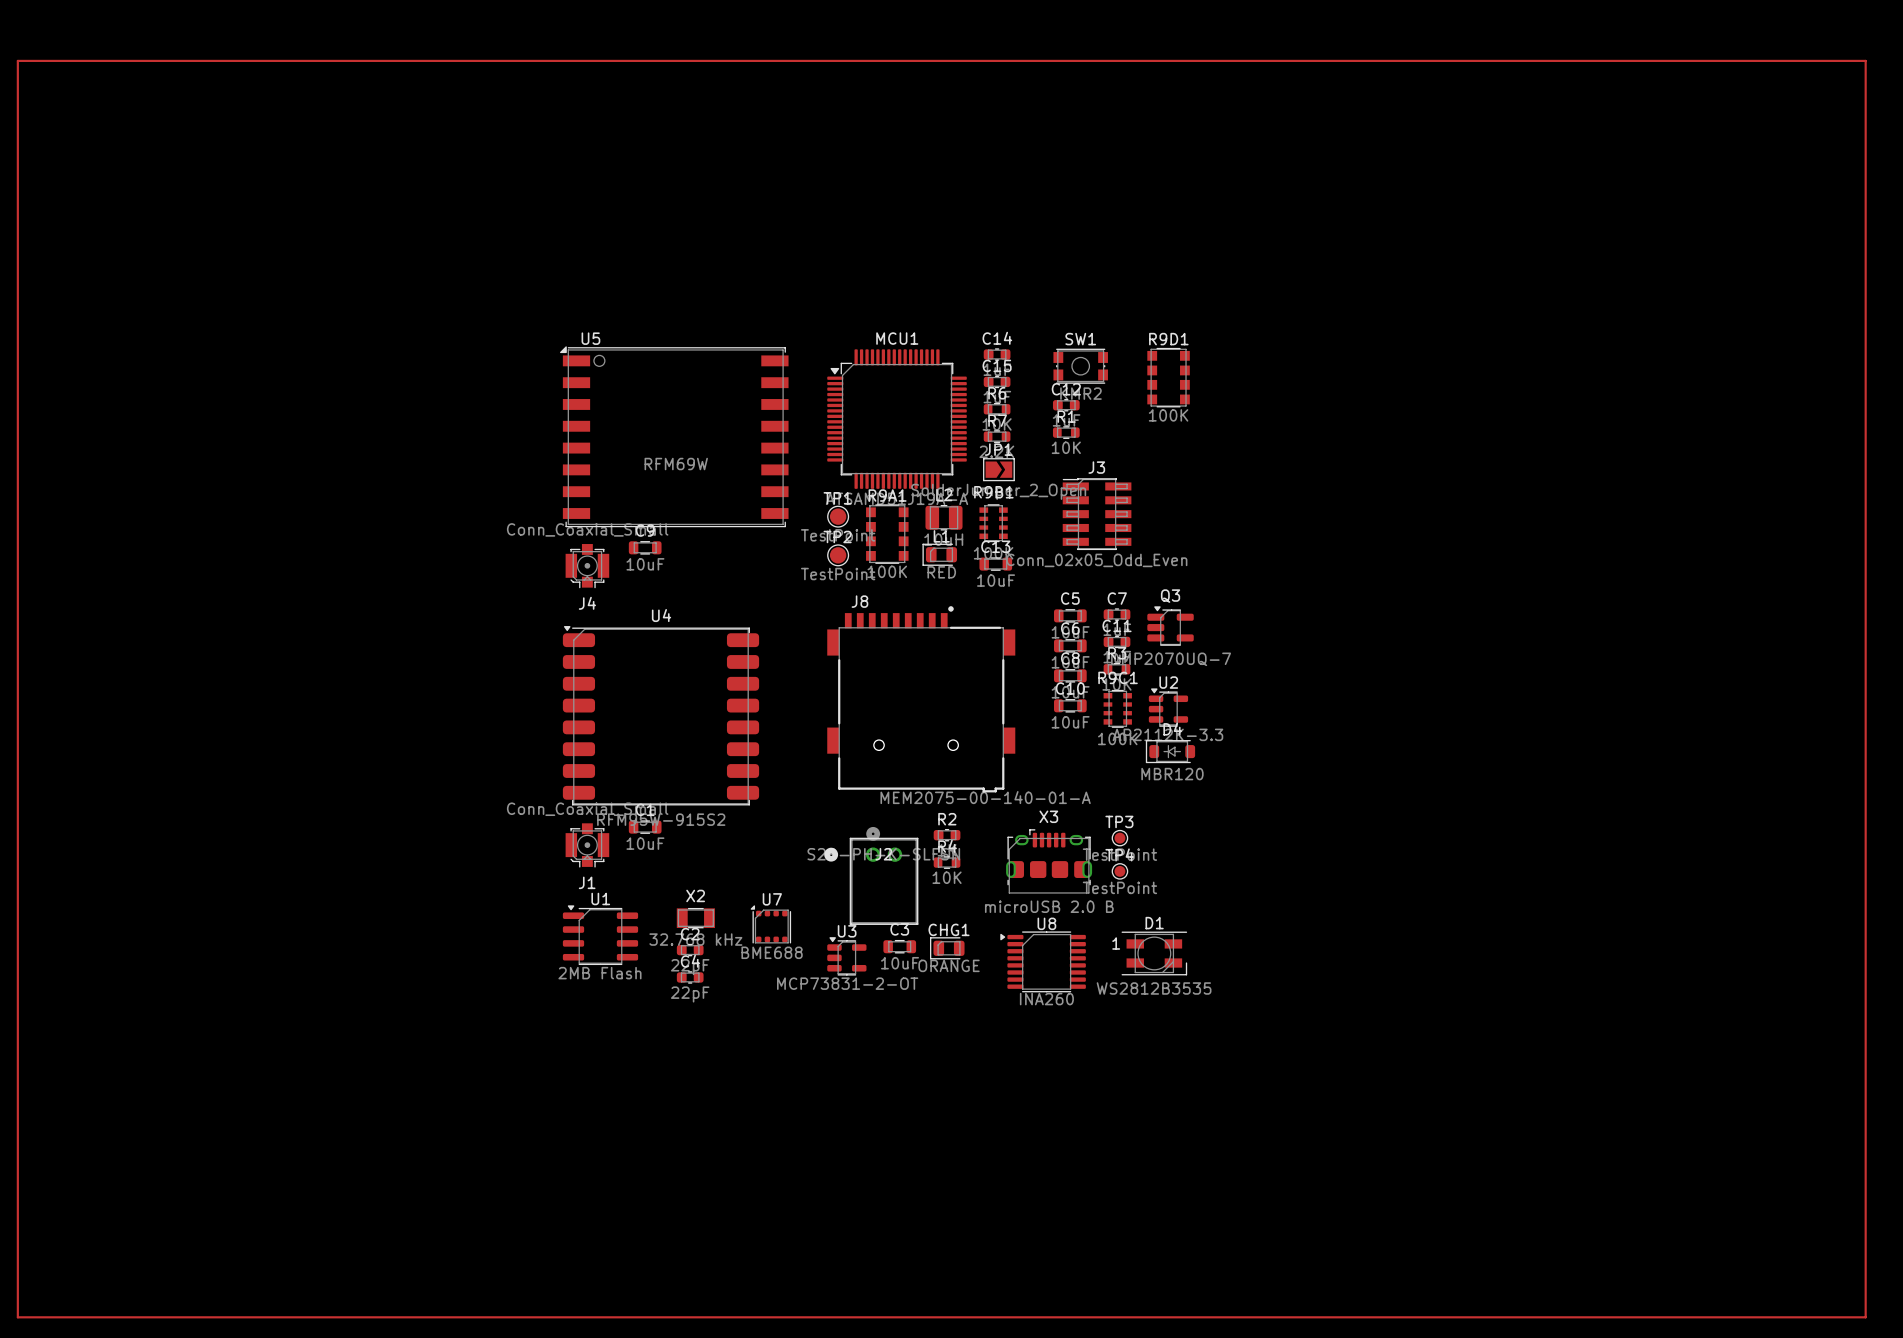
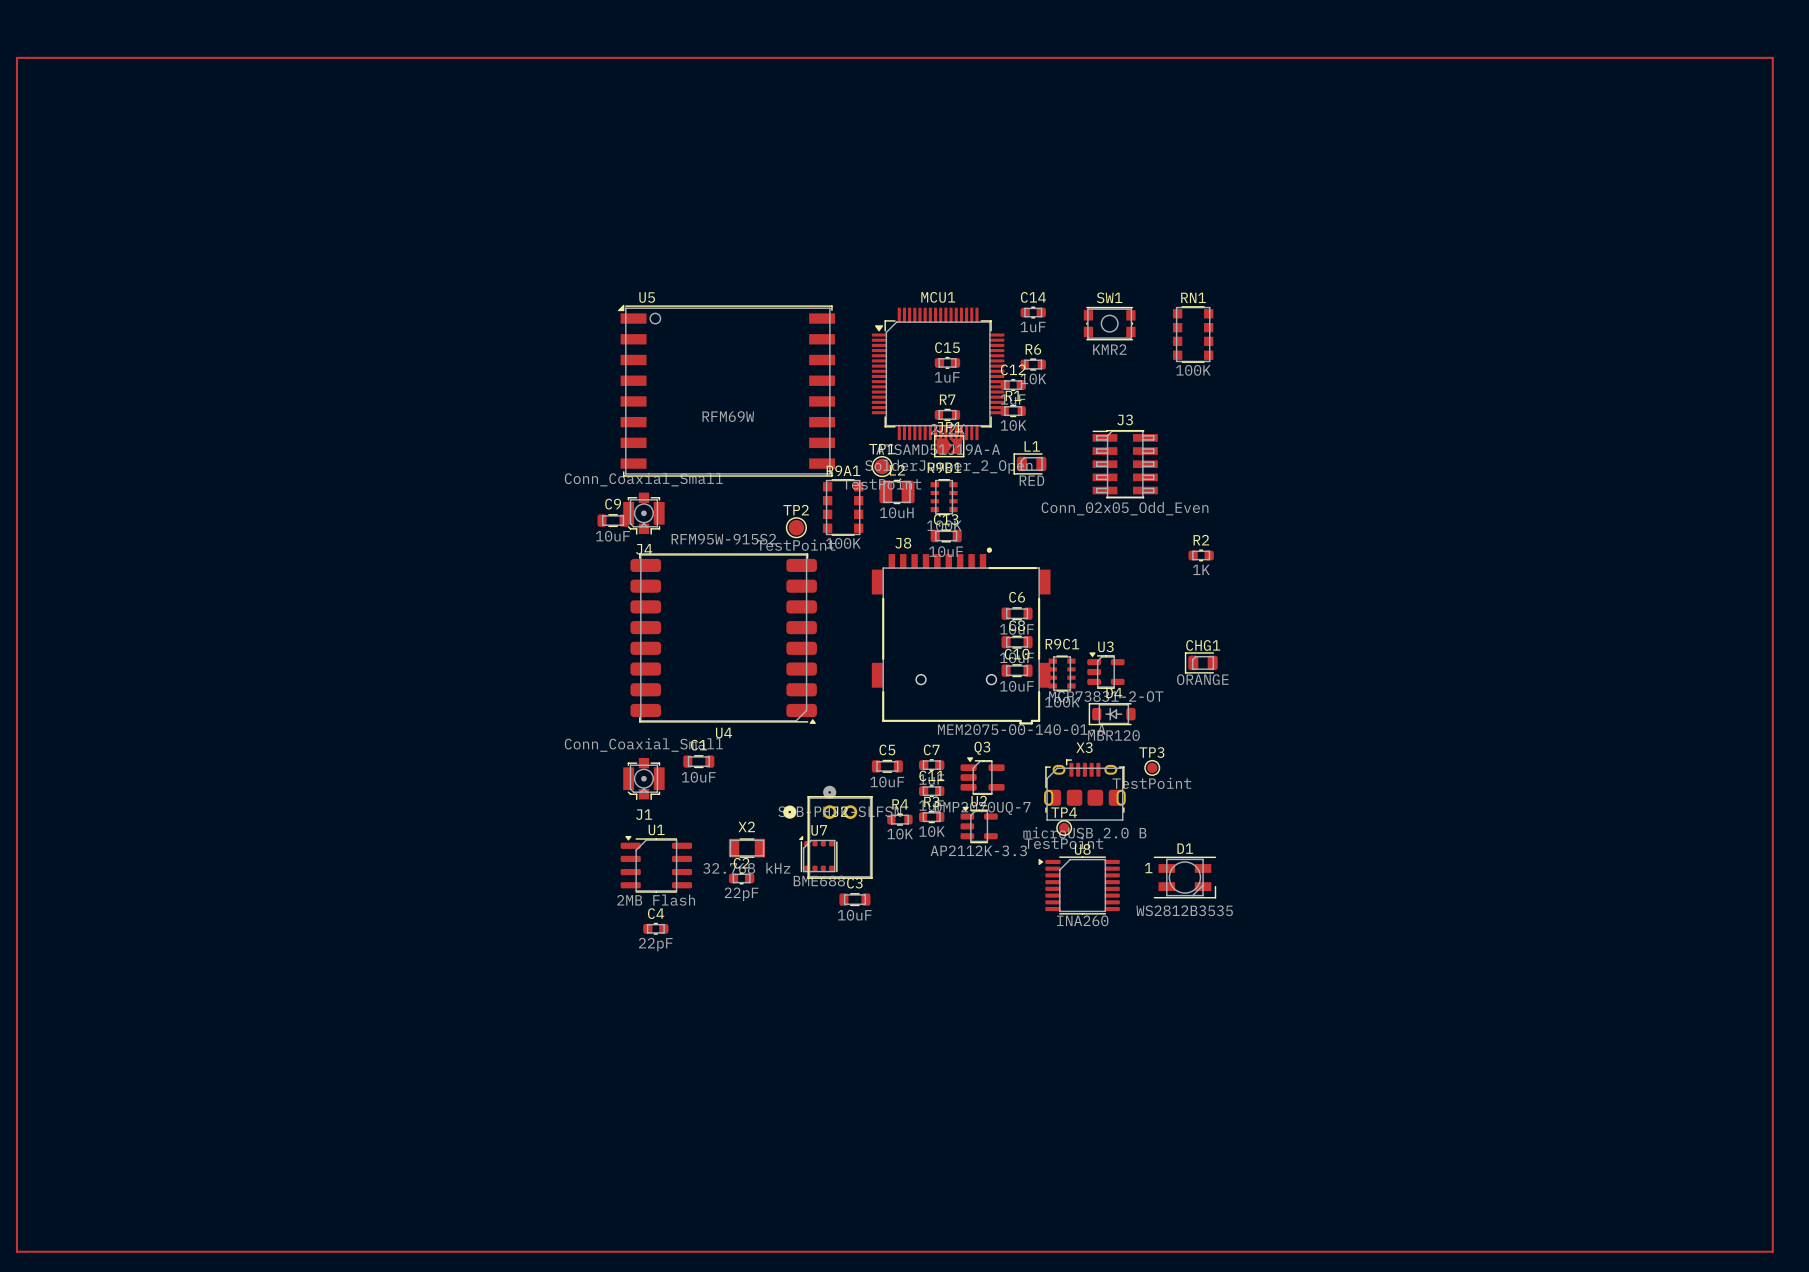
RN1: none -> 100K (1193, 334)
C14 position: (997, 354) -> (1033, 312)
SW1 position: (1080, 366) -> (1109, 323)
R9D1: 100K (1168, 377) -> none
R6 position: (997, 409) -> (1033, 364)
MCU1 position: (897, 419) -> (938, 373)
U5 position: (674, 436) -> (726, 390)
J3 position: (1097, 514) -> (1125, 464)
TP1 position: (838, 516) -> (882, 466)
L1 position: (939, 554) -> (1030, 463)
J4 position: (587, 566) -> (643, 513)
C7 position: (1117, 614) -> (931, 765)
C5 position: (1070, 615) -> (887, 766)
Q3 position: (1170, 626) -> (982, 776)
C11 position: (1117, 641) -> (931, 791)
R3 position: (1117, 669) -> (931, 817)
J8 position: (921, 699) -> (961, 636)
U2 position: (1168, 707) -> (979, 824)
U4 rotation: 0° (660, 715) -> 180° (723, 638)
C1 position: (645, 827) -> (698, 761)
R2 position: (947, 835) -> (1201, 555)
TP3 position: (1119, 838) -> (1152, 767)
J1 position: (587, 845) -> (643, 779)
X3 position: (1049, 861) -> (1084, 789)
X2 position: (695, 918) -> (747, 848)
U7 position: (770, 924) -> (818, 854)
U1 position: (600, 935) -> (656, 864)
CHG1 position: (947, 948) -> (1201, 662)
C2 position: (690, 950) -> (741, 878)
D1 position: (1154, 953) -> (1184, 877)
U3 position: (846, 956) -> (1105, 670)
U8 position: (1043, 961) -> (1079, 885)

